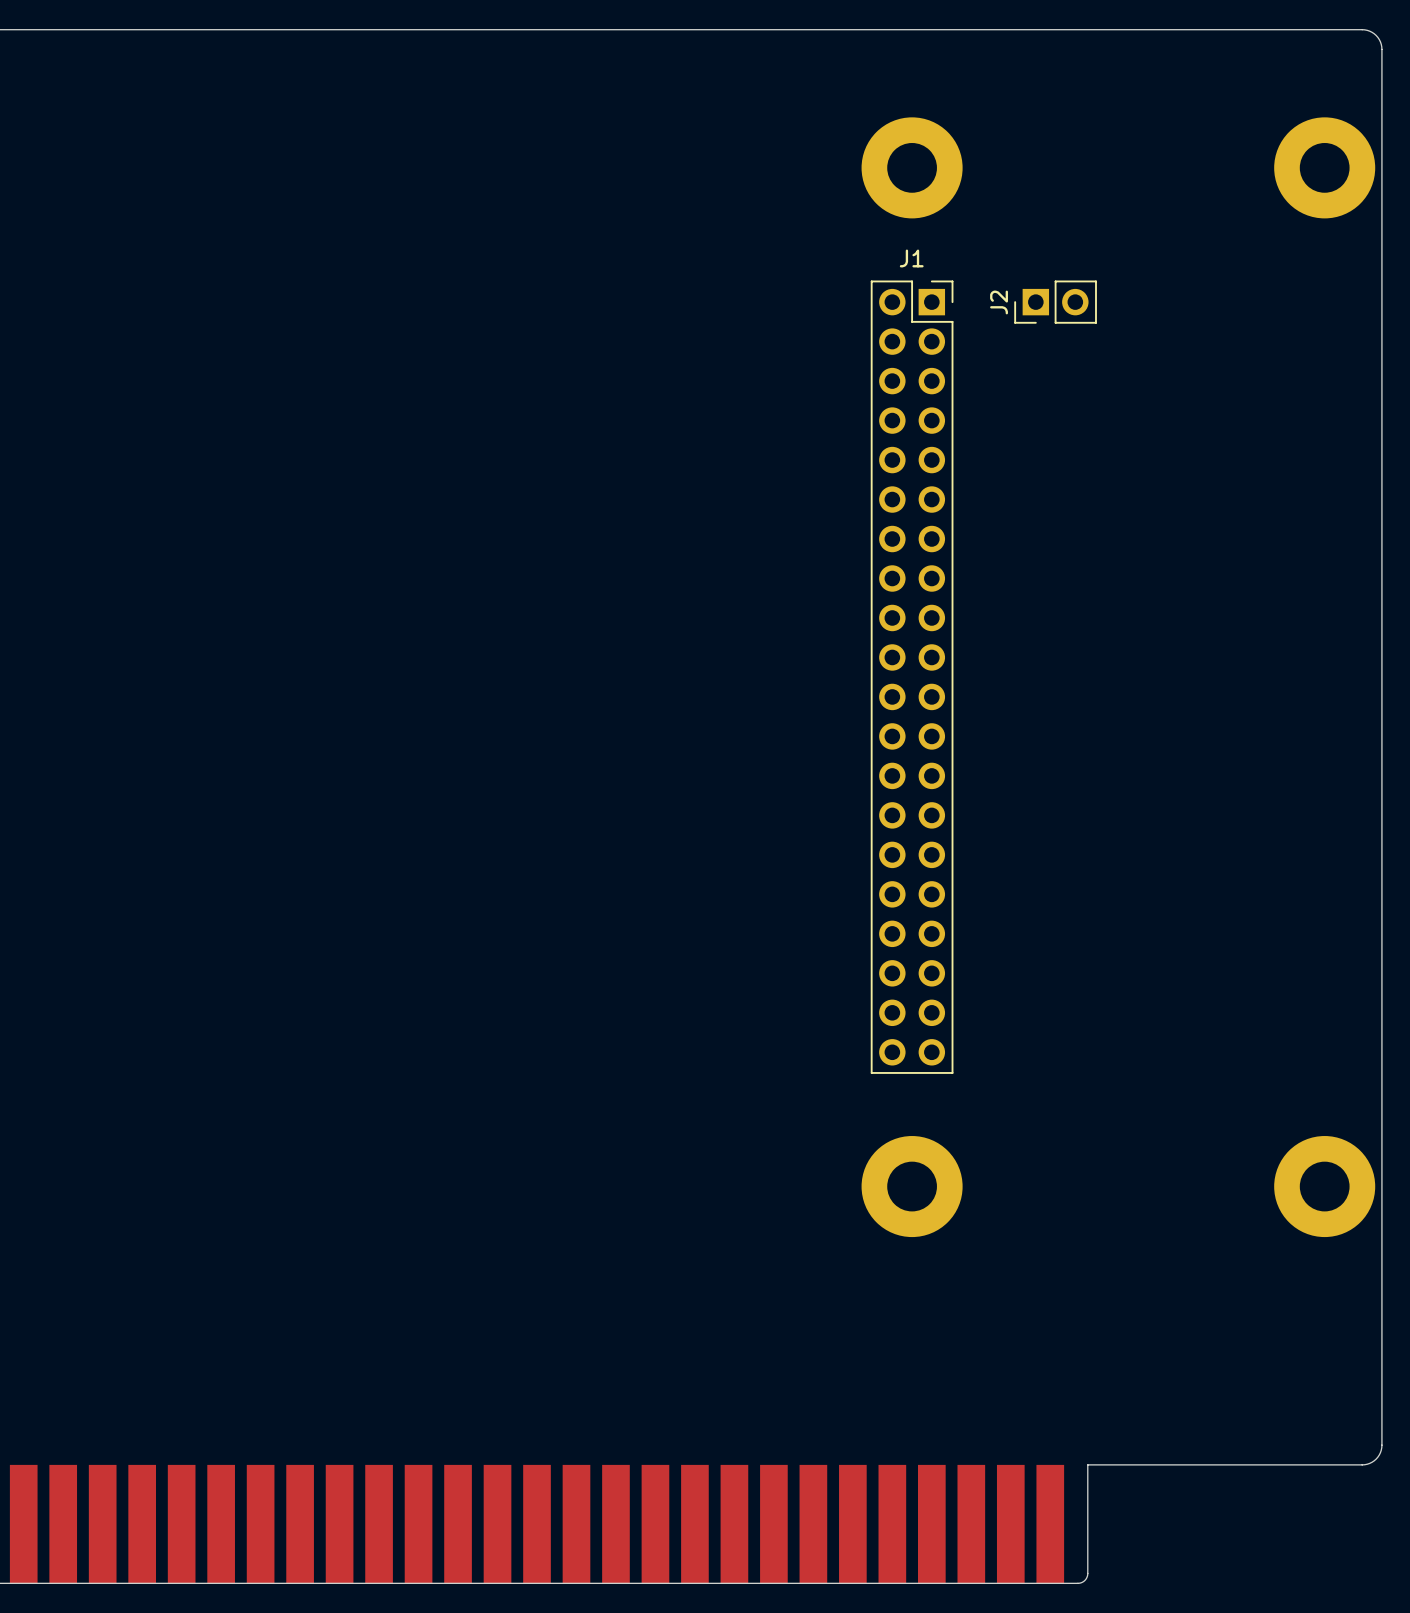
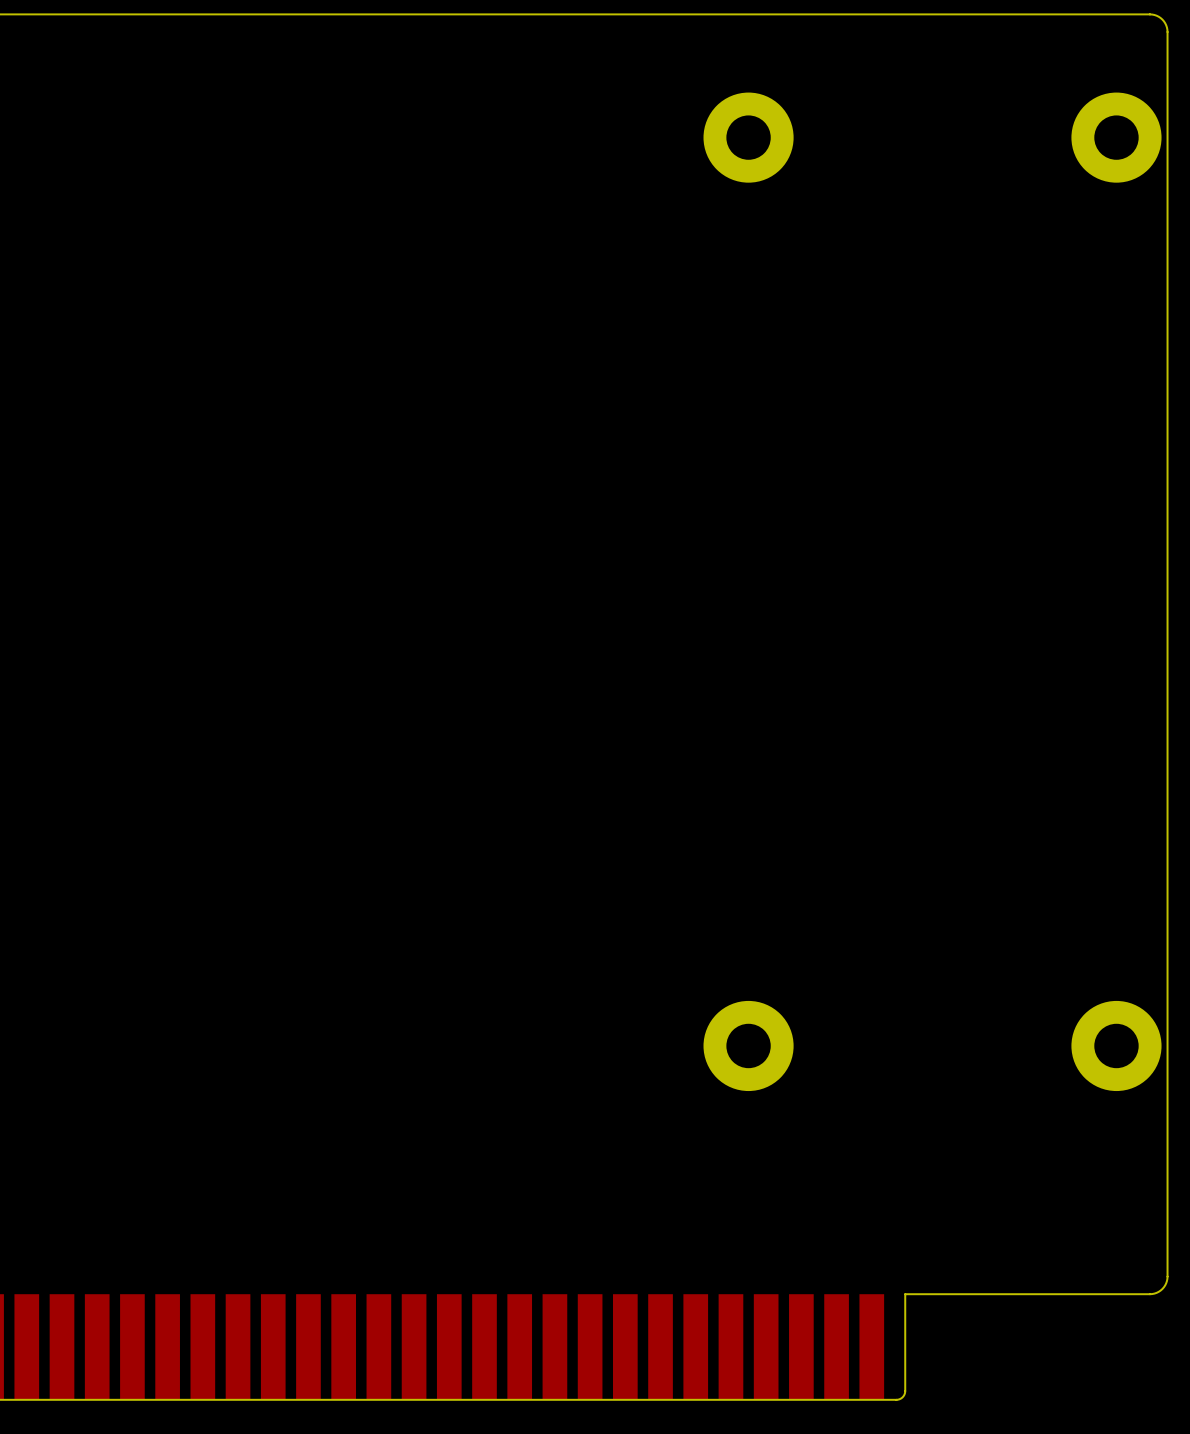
J2: (1055, 302) -> none
J1: (912, 677) -> none

